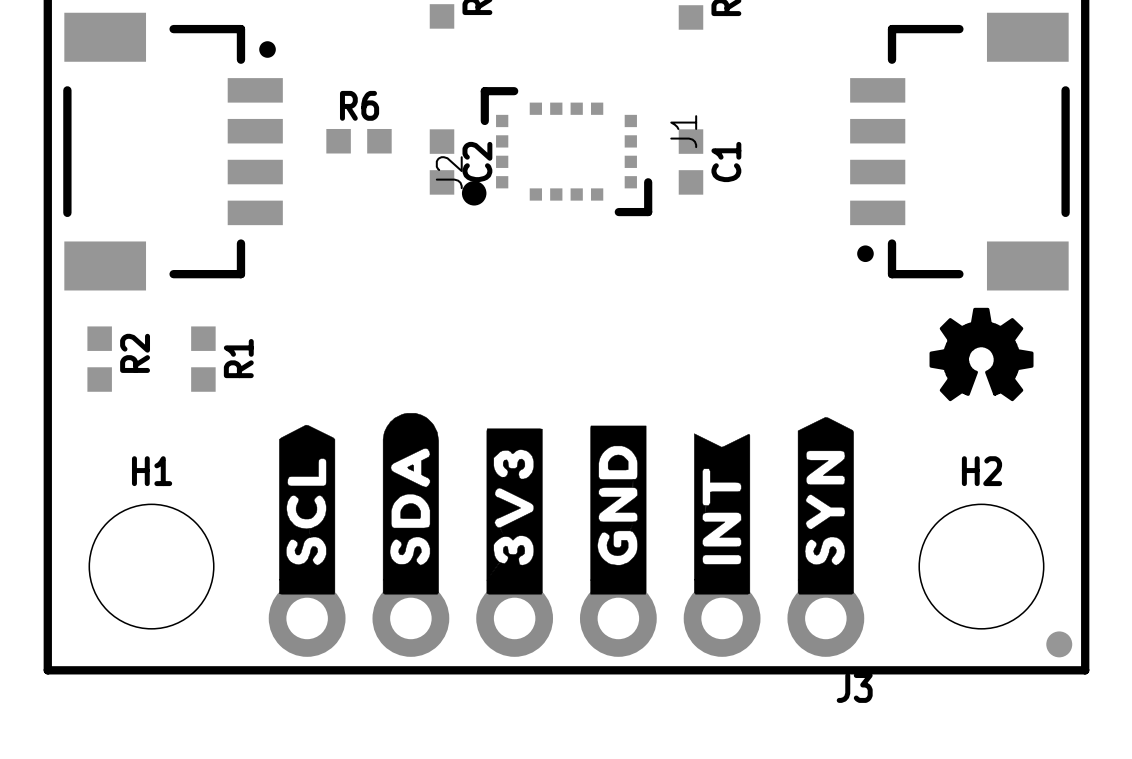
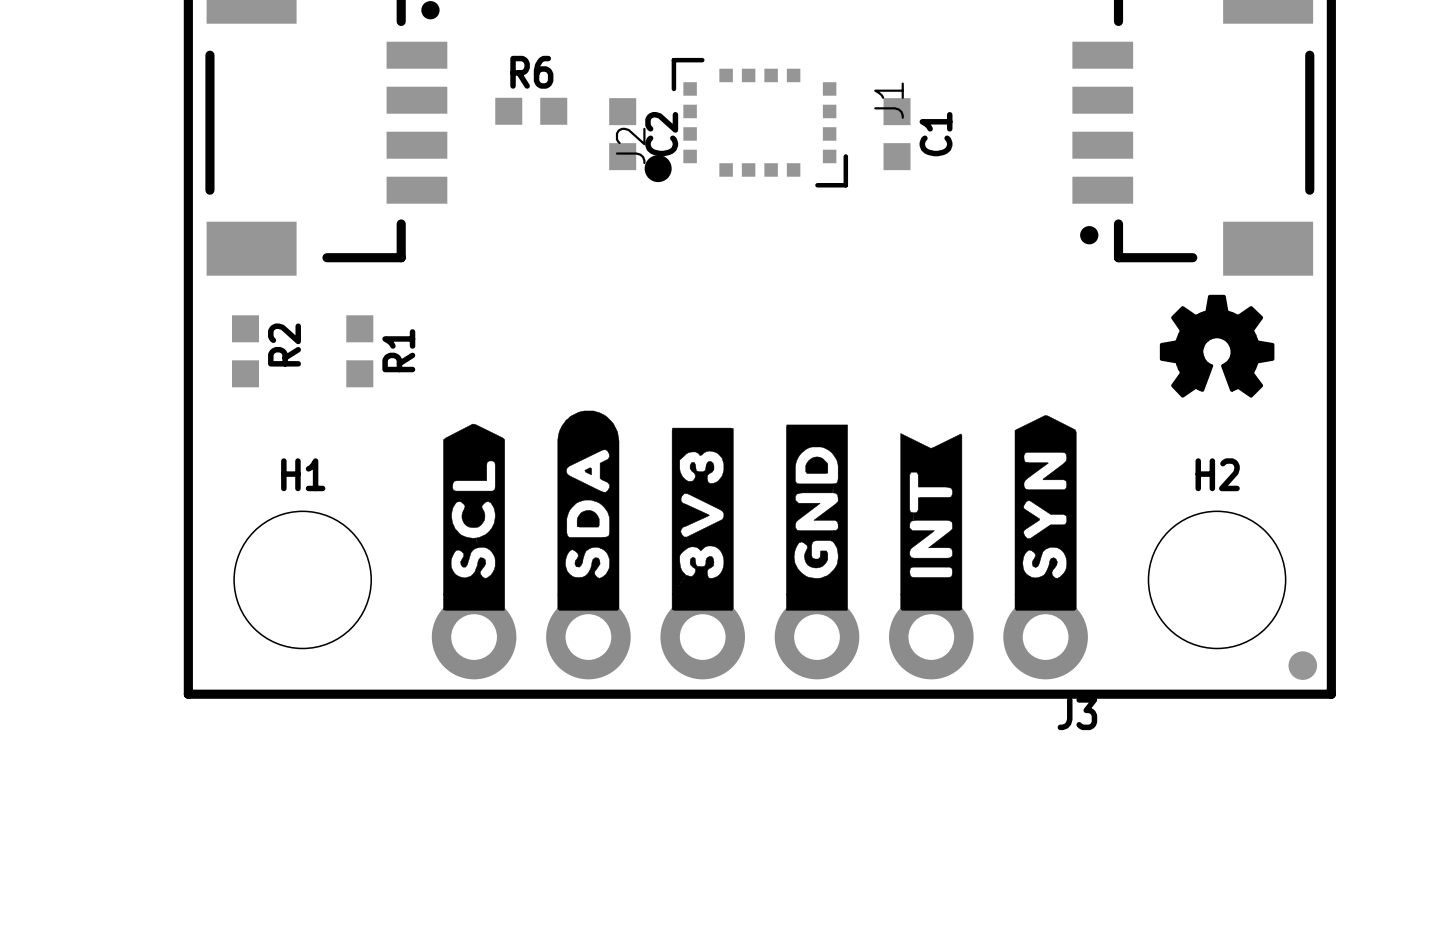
part footprint: [461, 87, 653, 217] -> [644, 57, 849, 188]

